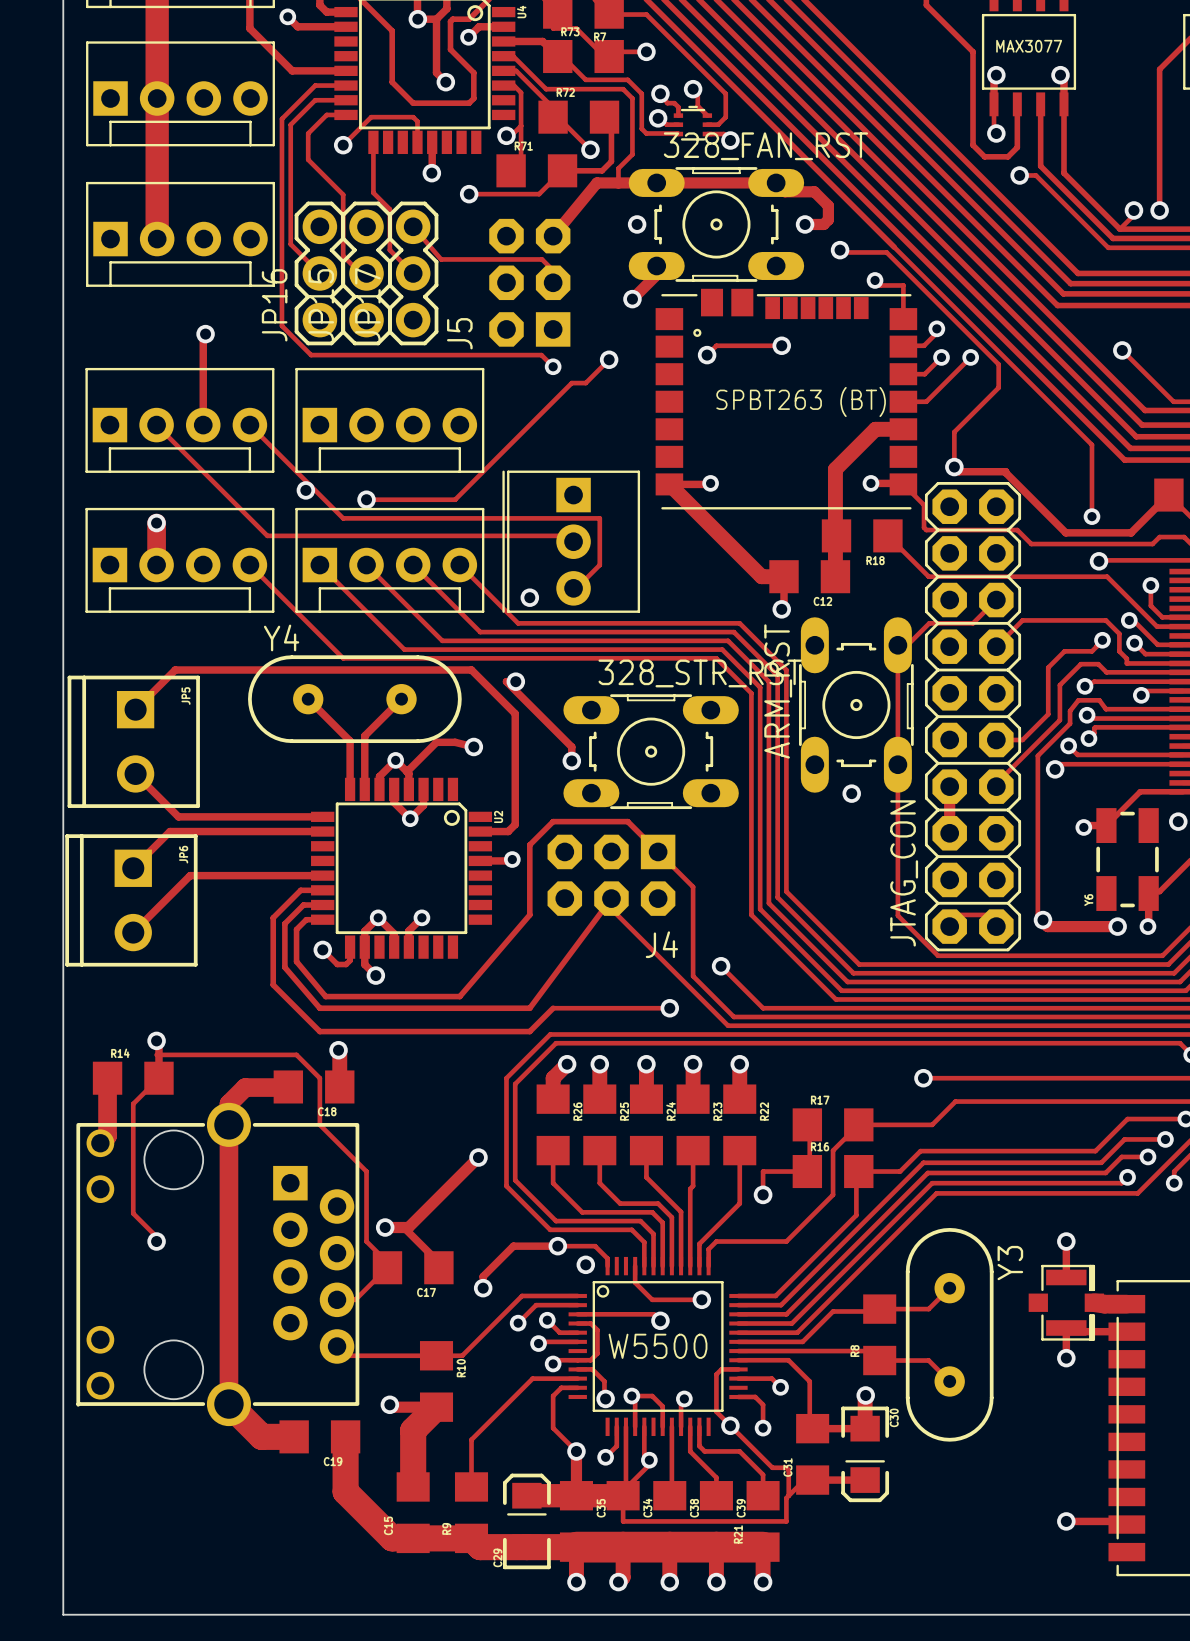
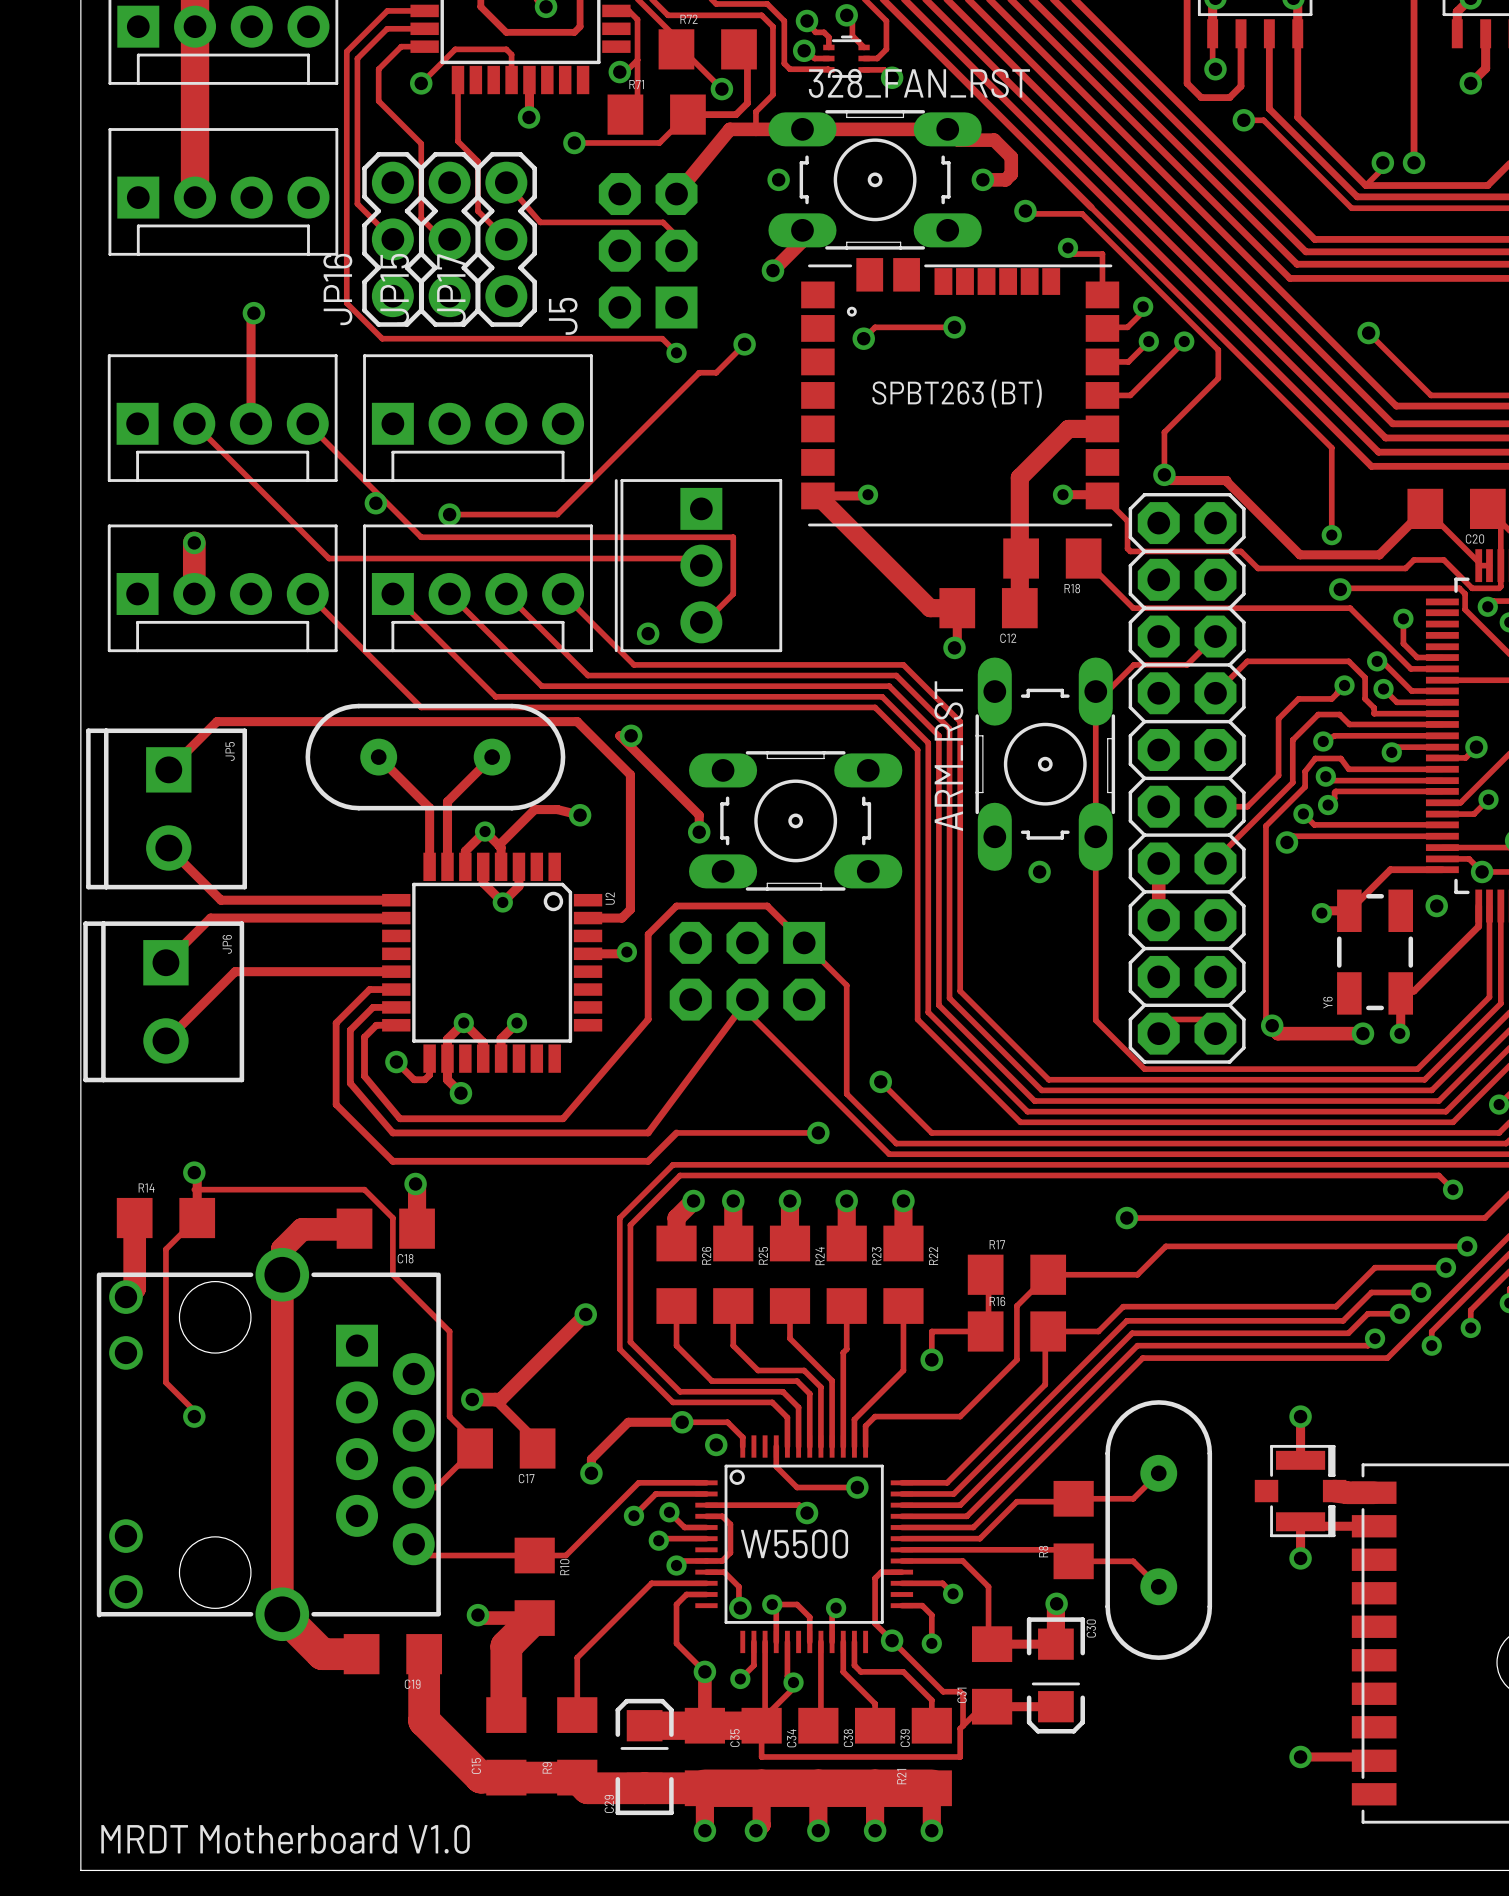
Y4 name: Y4 (281, 637) -> none
328_STR_RST name: 328_STR_RST (700, 673) -> none
JTAG_CON name: JTAG_CON (904, 873) -> none
J4 name: J4 (661, 944) -> none
Y3 name: Y3 (1010, 1263) -> none
text: none -> MRDT Motherboard V1.0 (285, 1839)

